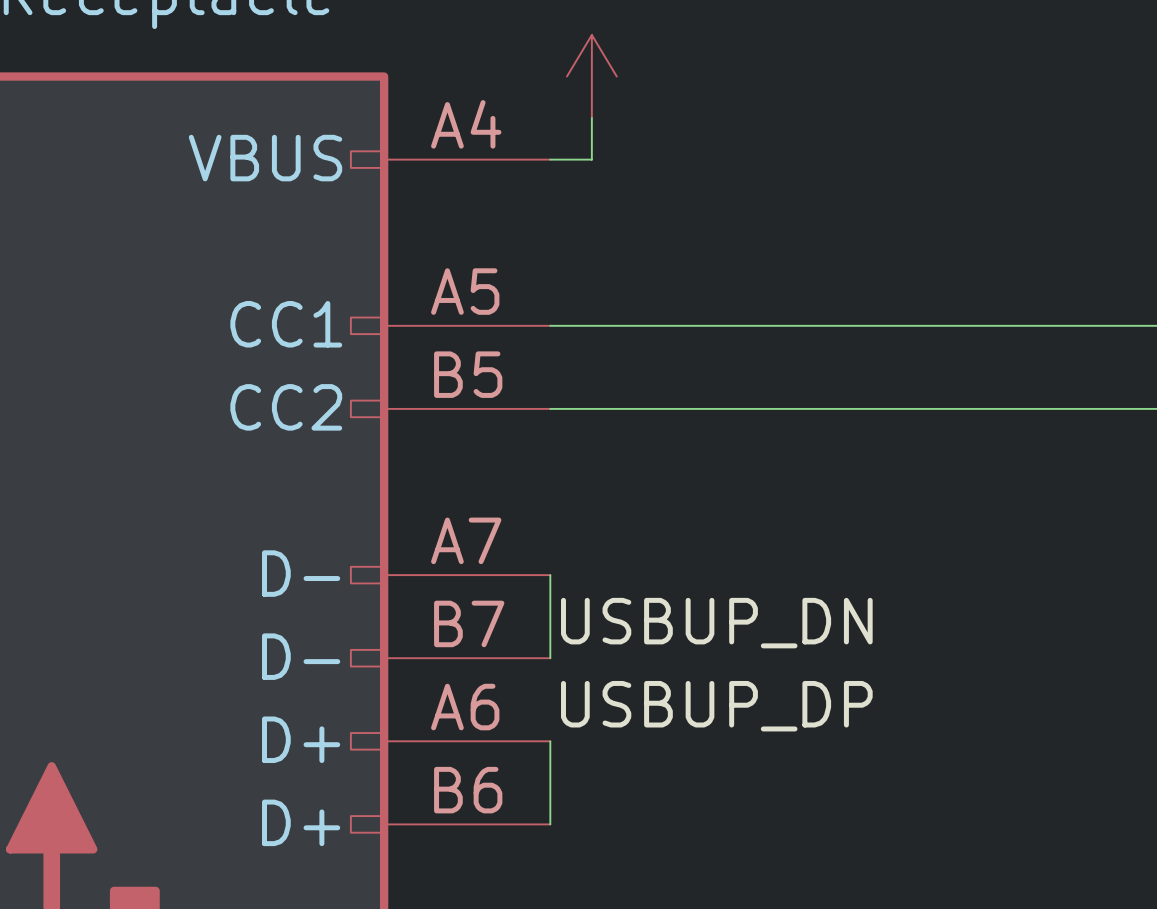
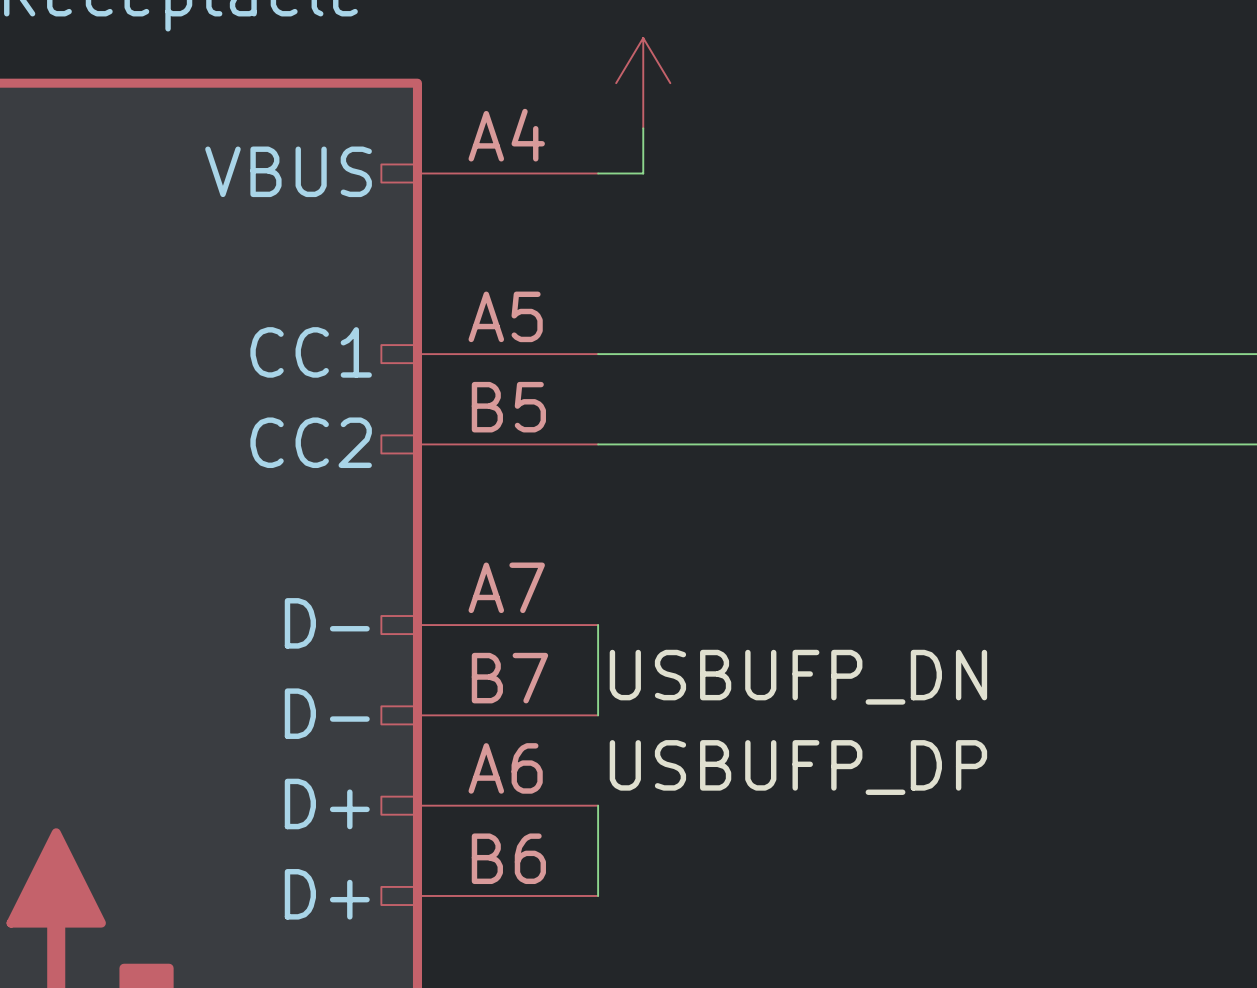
label: USBUP_DN (716, 623) -> USBUFP_DN (798, 677)
label: USBUP_DP (716, 706) -> USBUFP_DP (798, 767)

